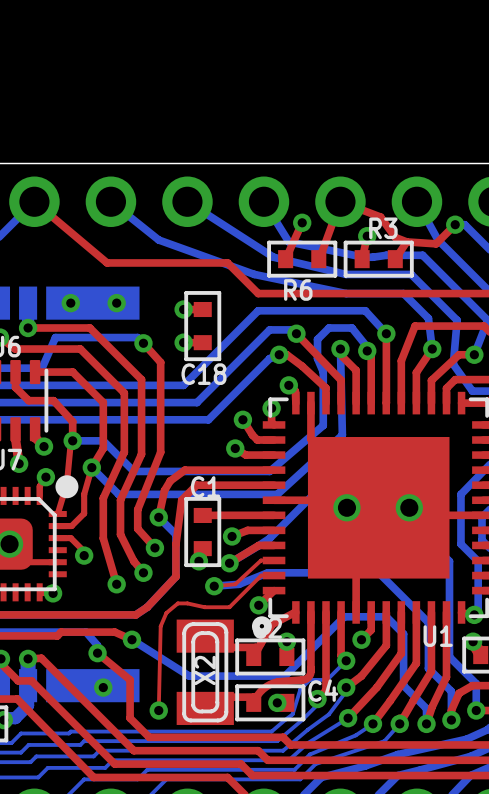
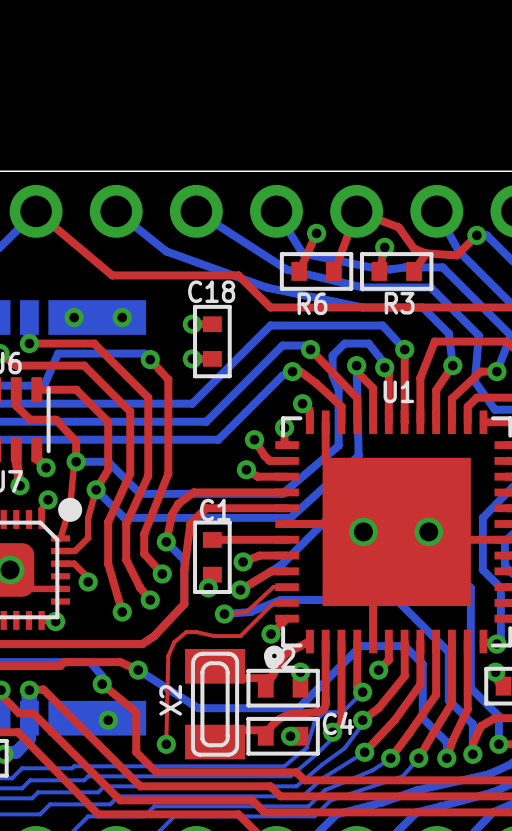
R3 name position: R3 (383, 228) -> R3 (399, 303)
C18 name position: C18 (203, 374) -> C18 (211, 291)
U1 name position: U1 (438, 636) -> U1 (398, 391)
X2 name position: X2 (204, 670) -> X2 (170, 700)

